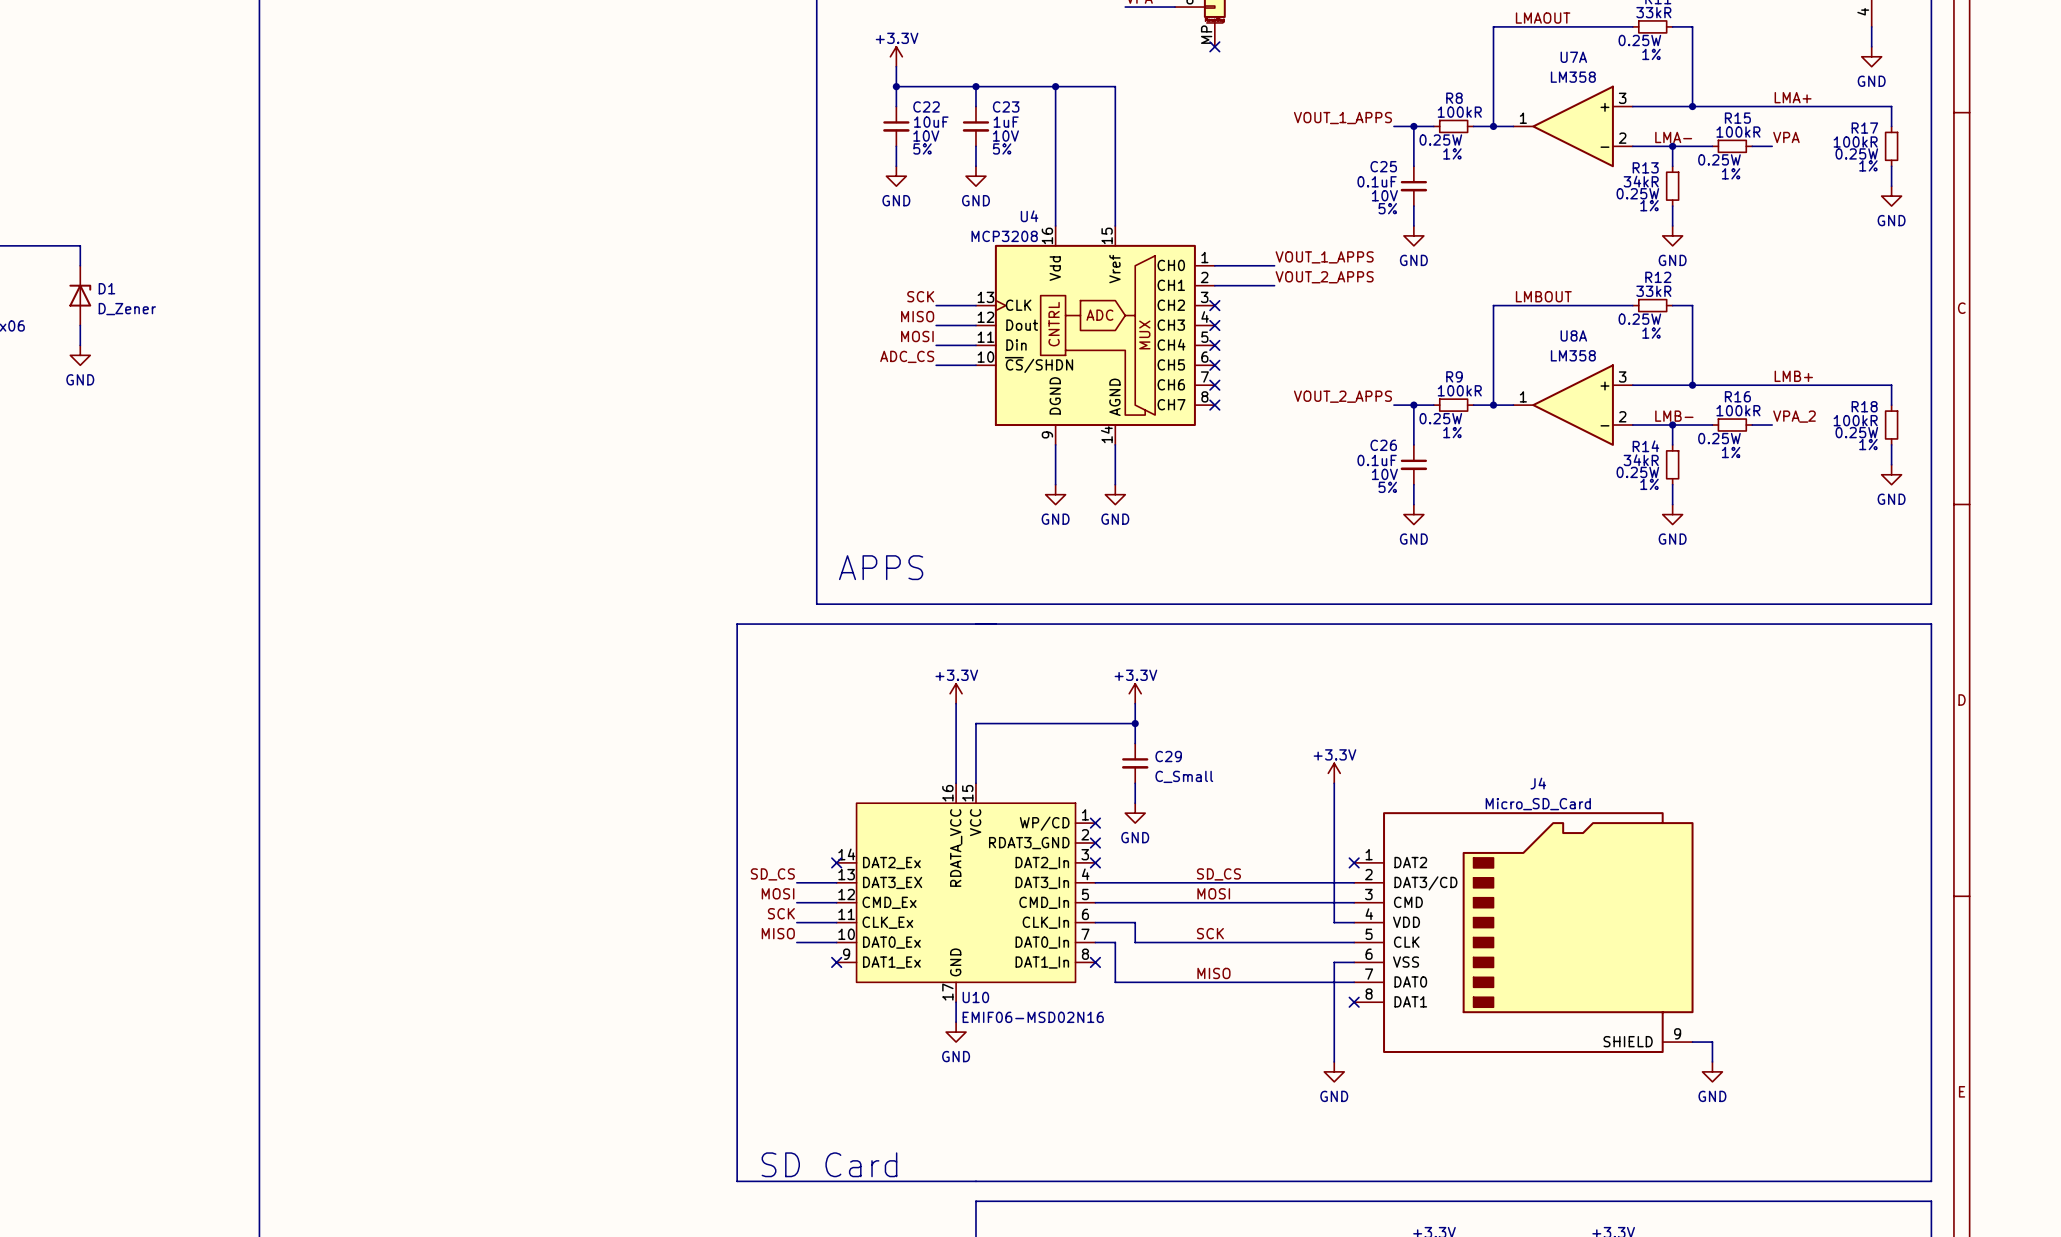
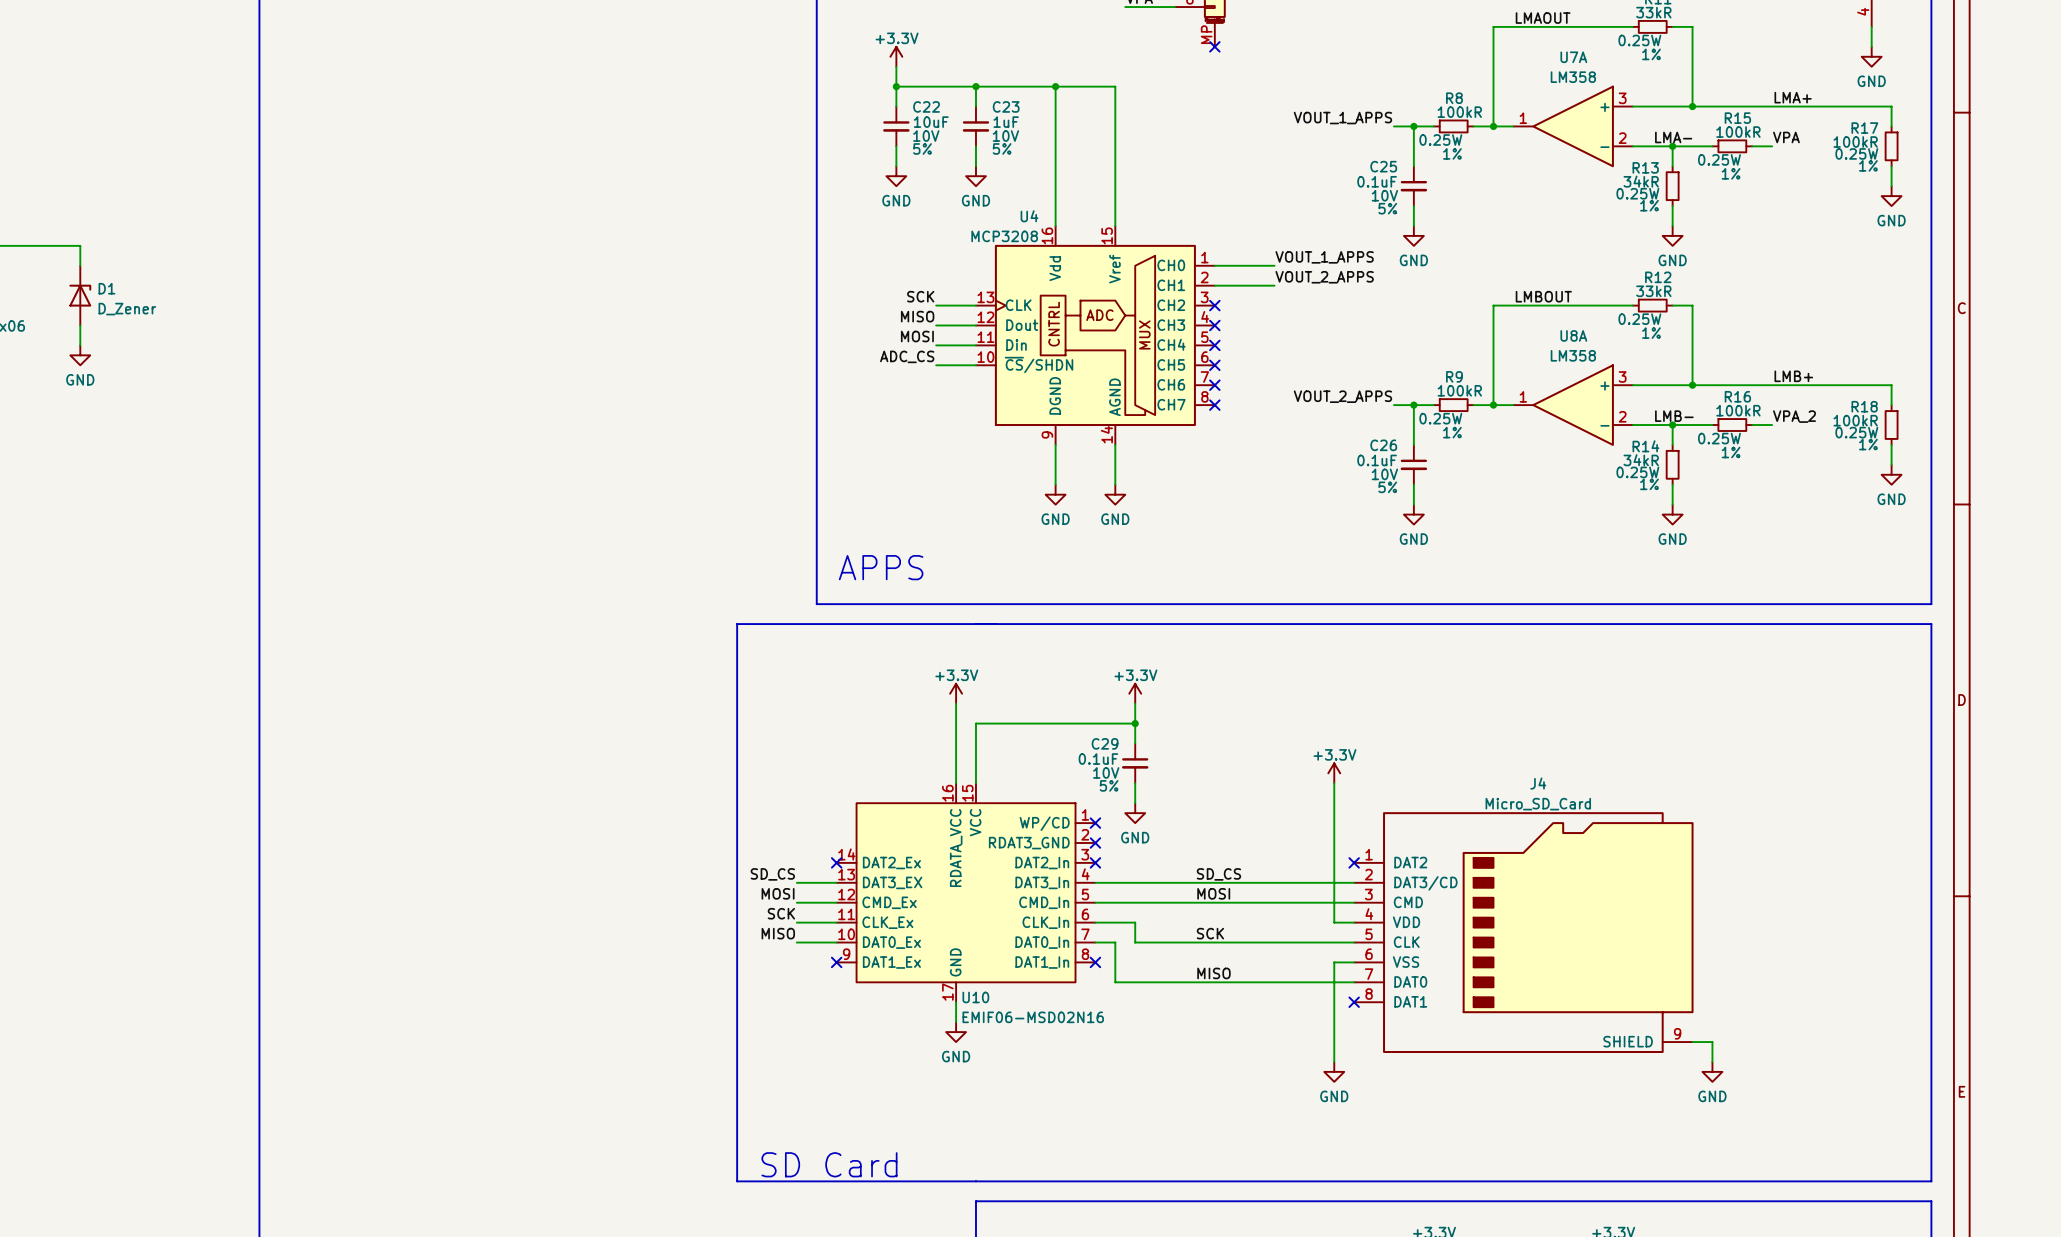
C29 name position: C29 (1168, 756) -> C29 (1105, 743)
C29 text: none -> 10V (1106, 772)
C29 value: C_Small (1184, 776) -> 0.1uF (1098, 759)
C29 text: none -> 5% (1109, 785)

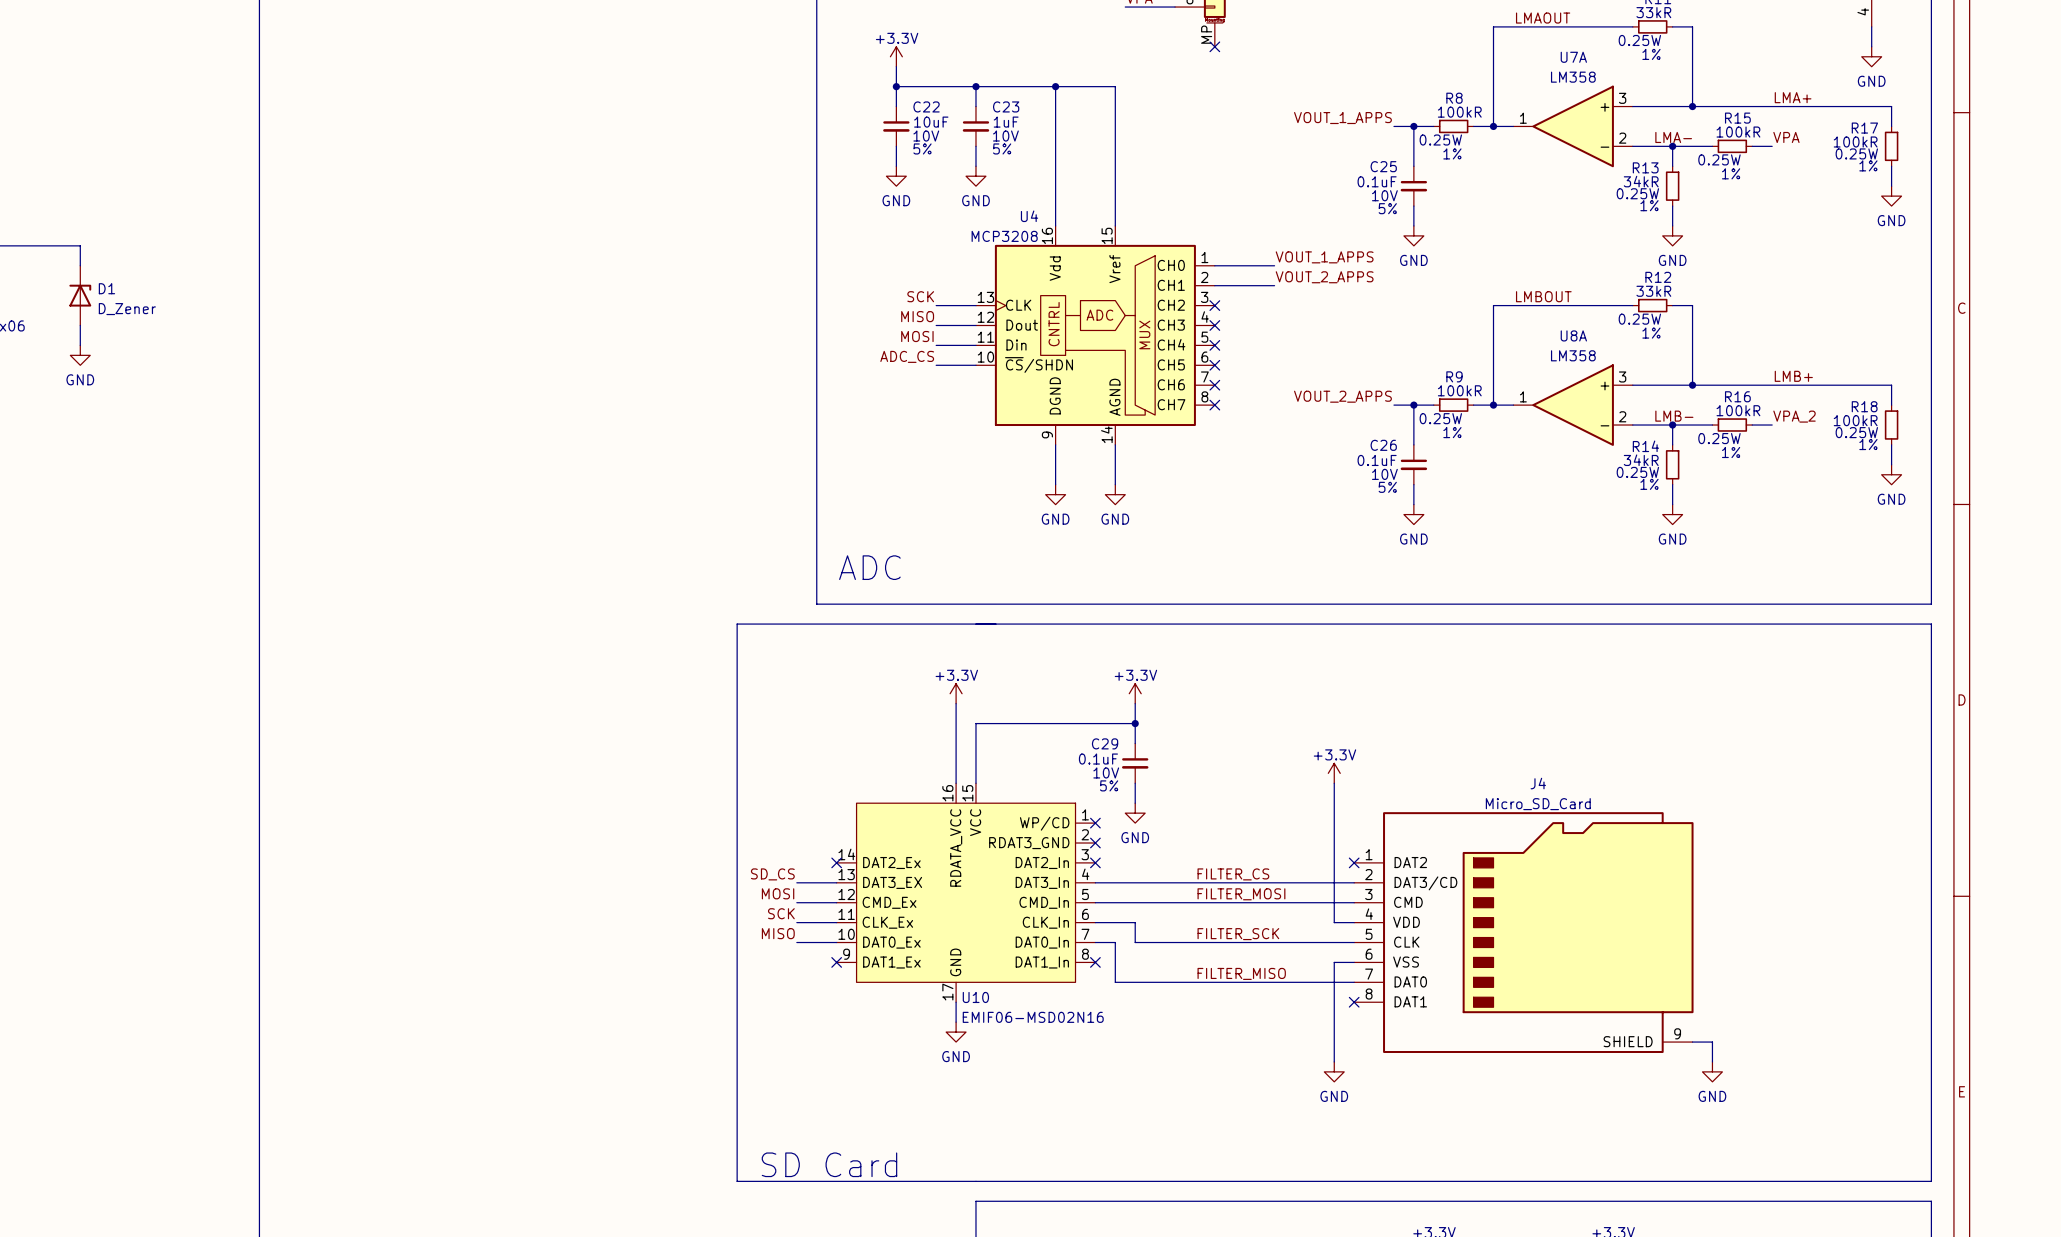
text: APPS (881, 567) -> ADC (869, 567)
label: SD_CS (1218, 874) -> FILTER_CS (1233, 874)
label: MOSI (1213, 893) -> FILTER_MOSI (1241, 894)
label: SCK (1210, 933) -> FILTER_SCK (1238, 934)
label: MISO (1213, 973) -> FILTER_MISO (1241, 973)

